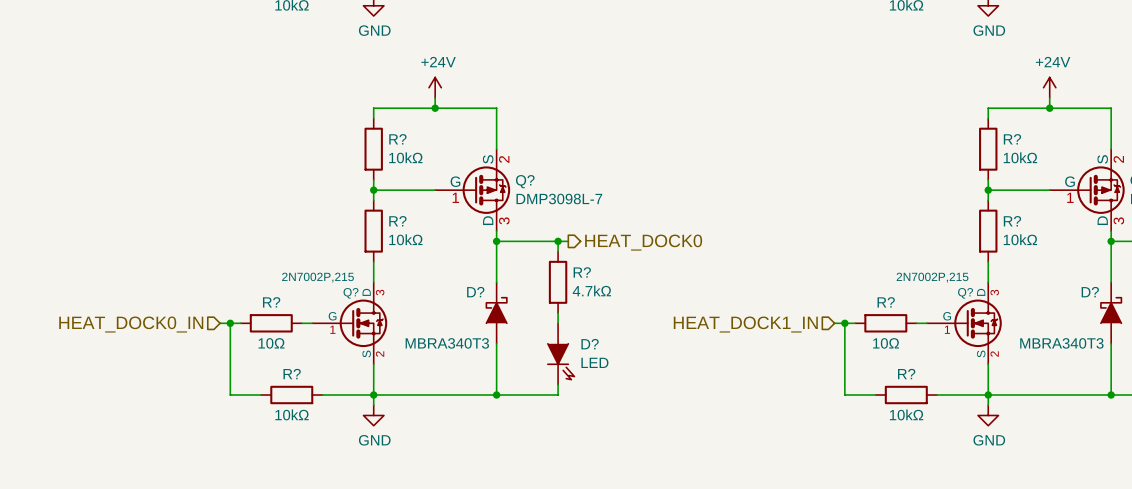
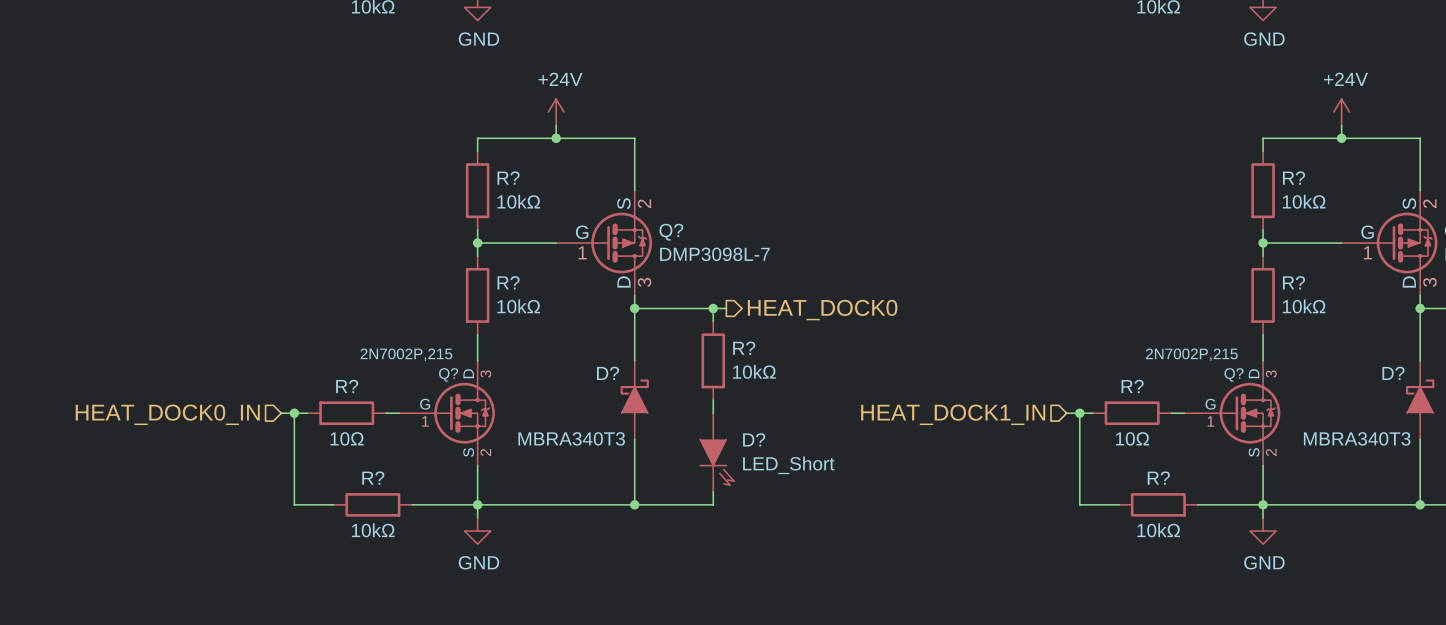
R? value: 4.7kΩ (591, 290) -> 10kΩ (754, 371)
D? value: LED (594, 362) -> LED_Short (788, 465)

